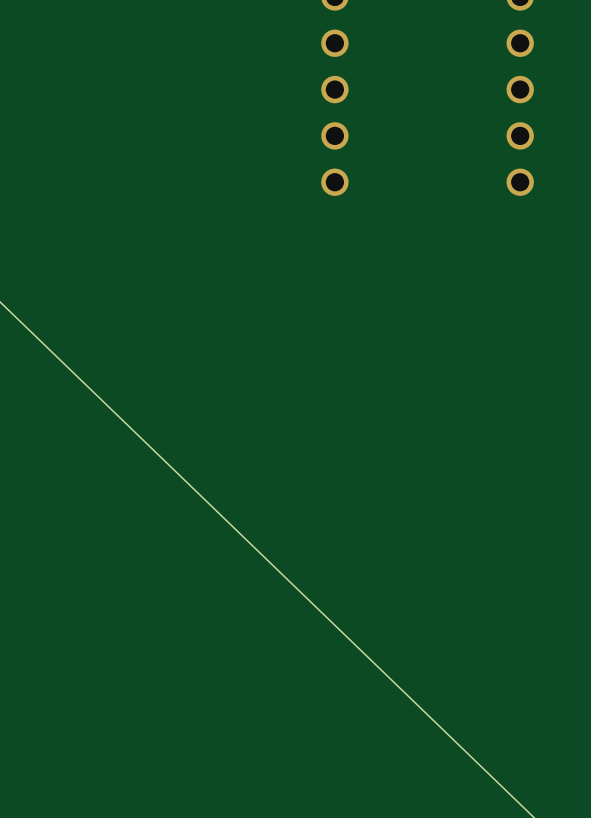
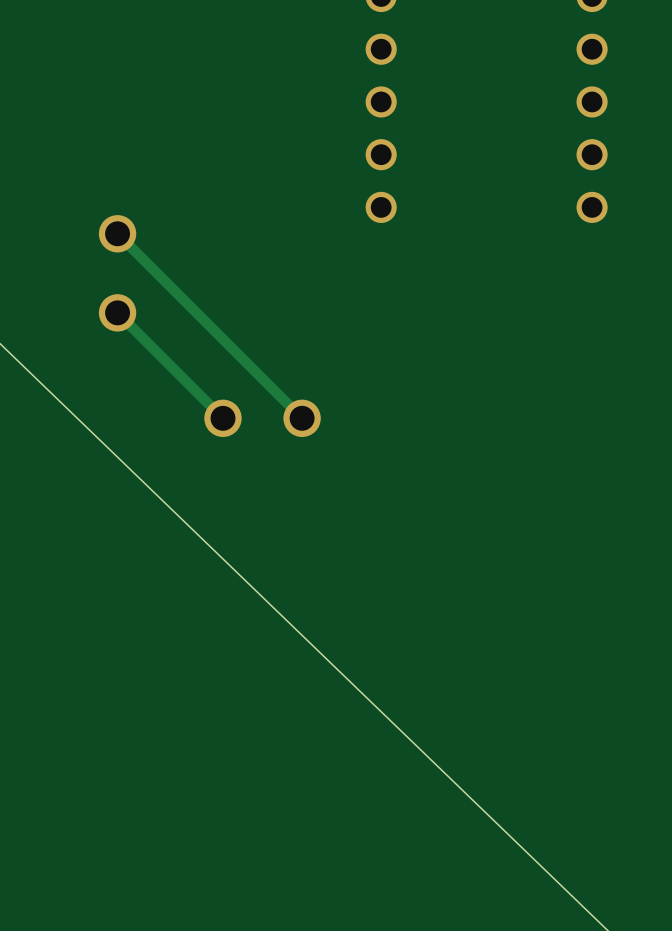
track: none -> (117, 233) (302, 418)
via: none -> (117, 233)
track: none -> (117, 312) (223, 418)
via: none -> (117, 312)
via: none -> (223, 418)
via: none -> (302, 418)

